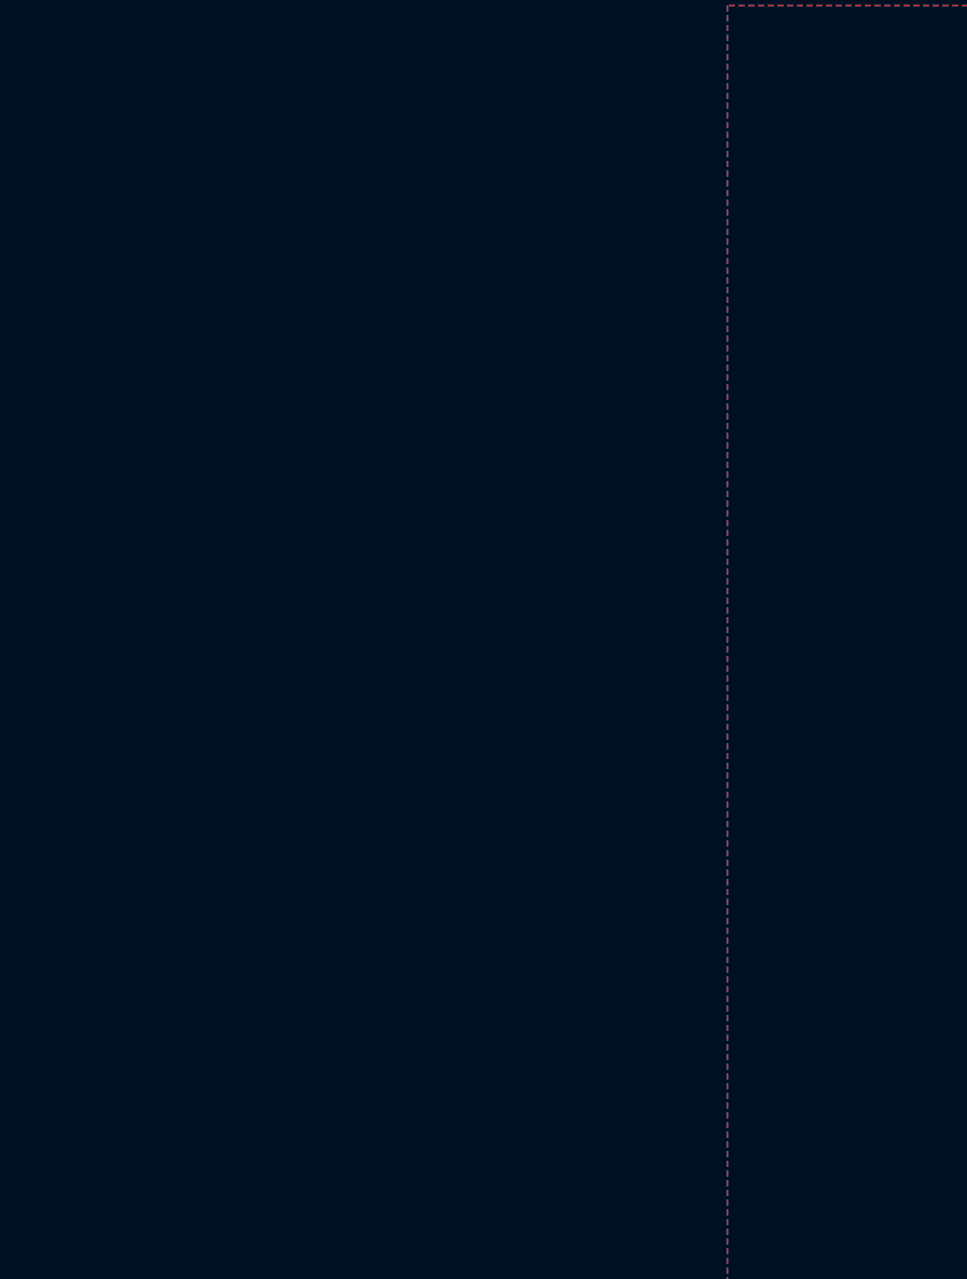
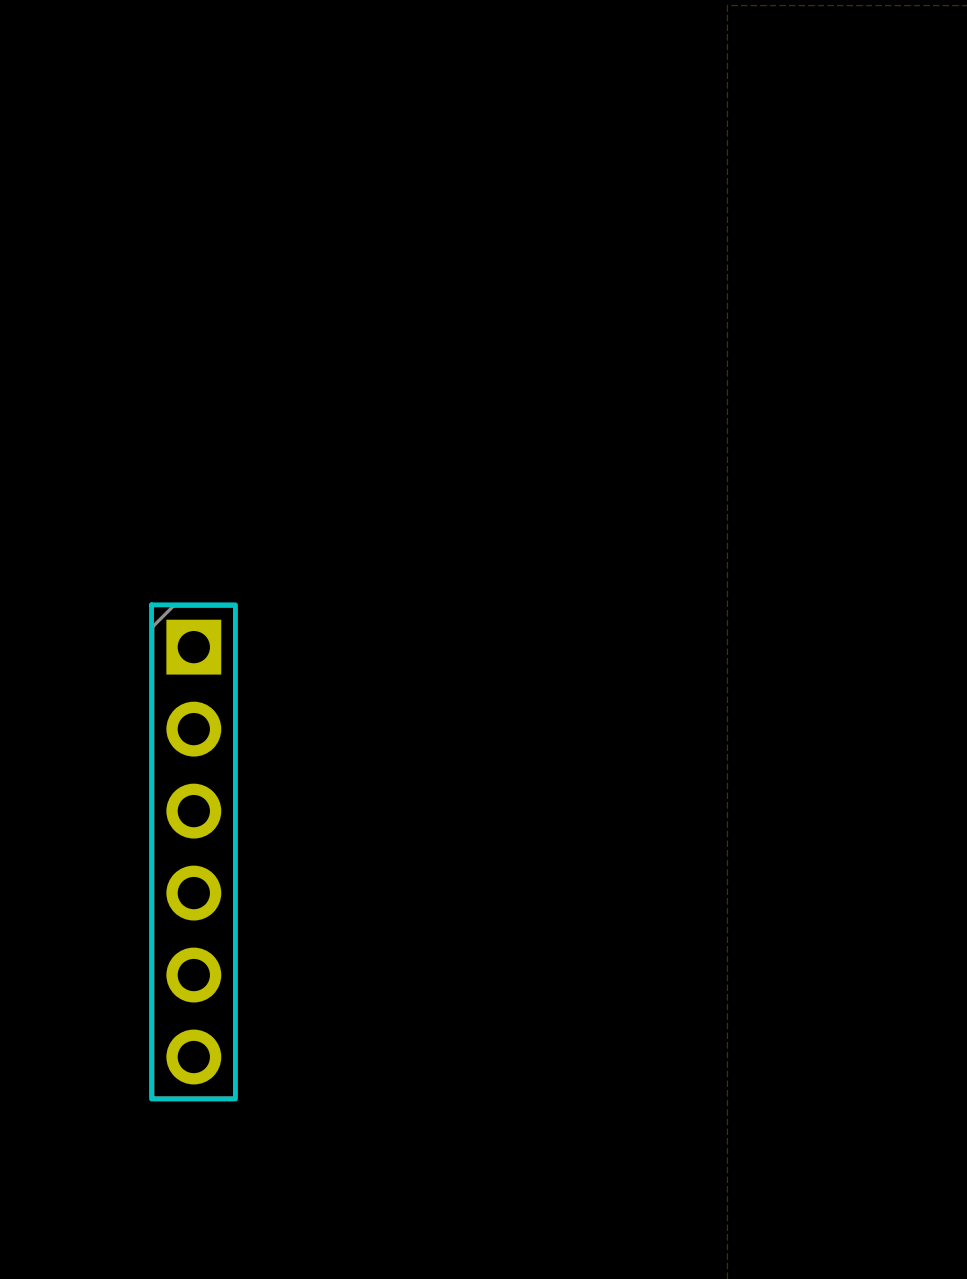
part: none -> (193, 851)

